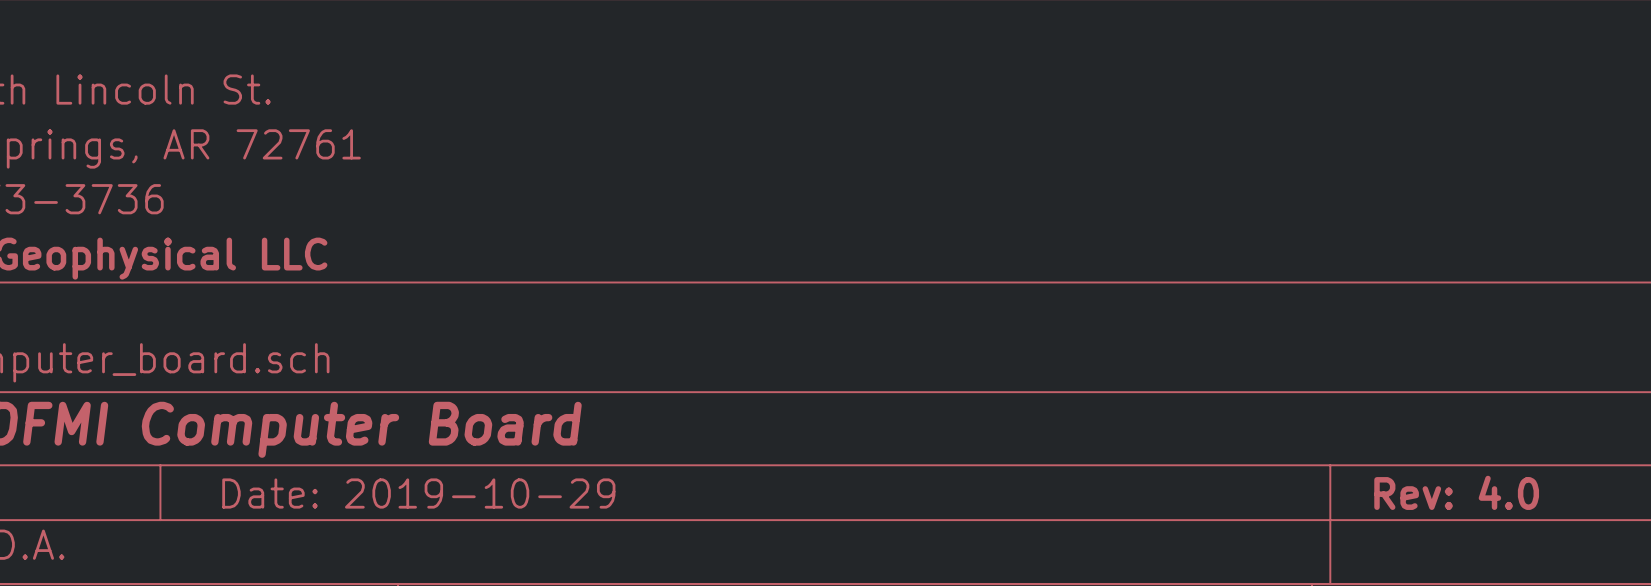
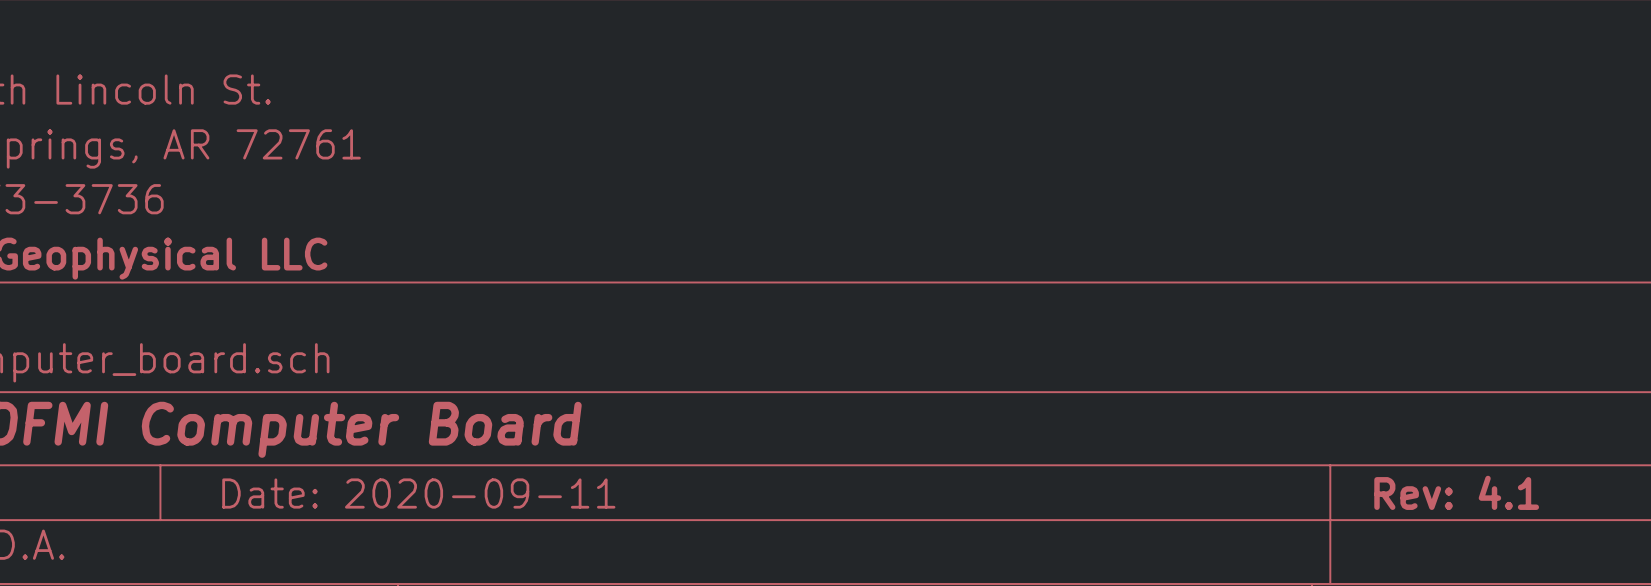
title block: Rev: 4.0 (1456, 492) -> Rev: 4.1 (1456, 492)
title block: Date: 2019-10-29 (418, 493) -> Date: 2020-09-11 (418, 493)

